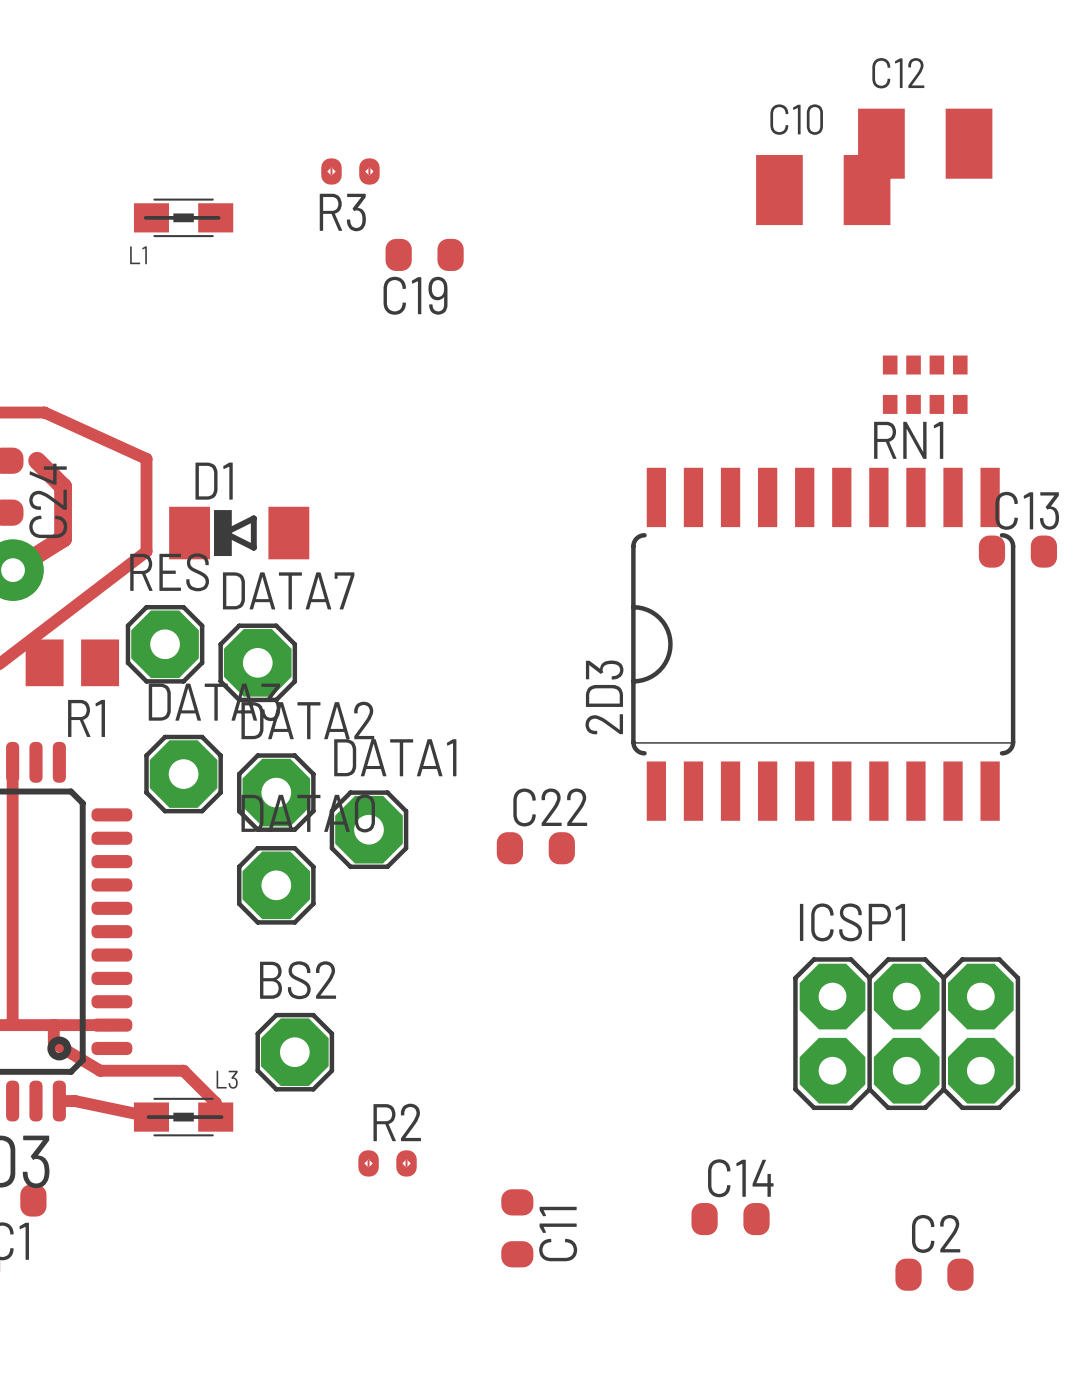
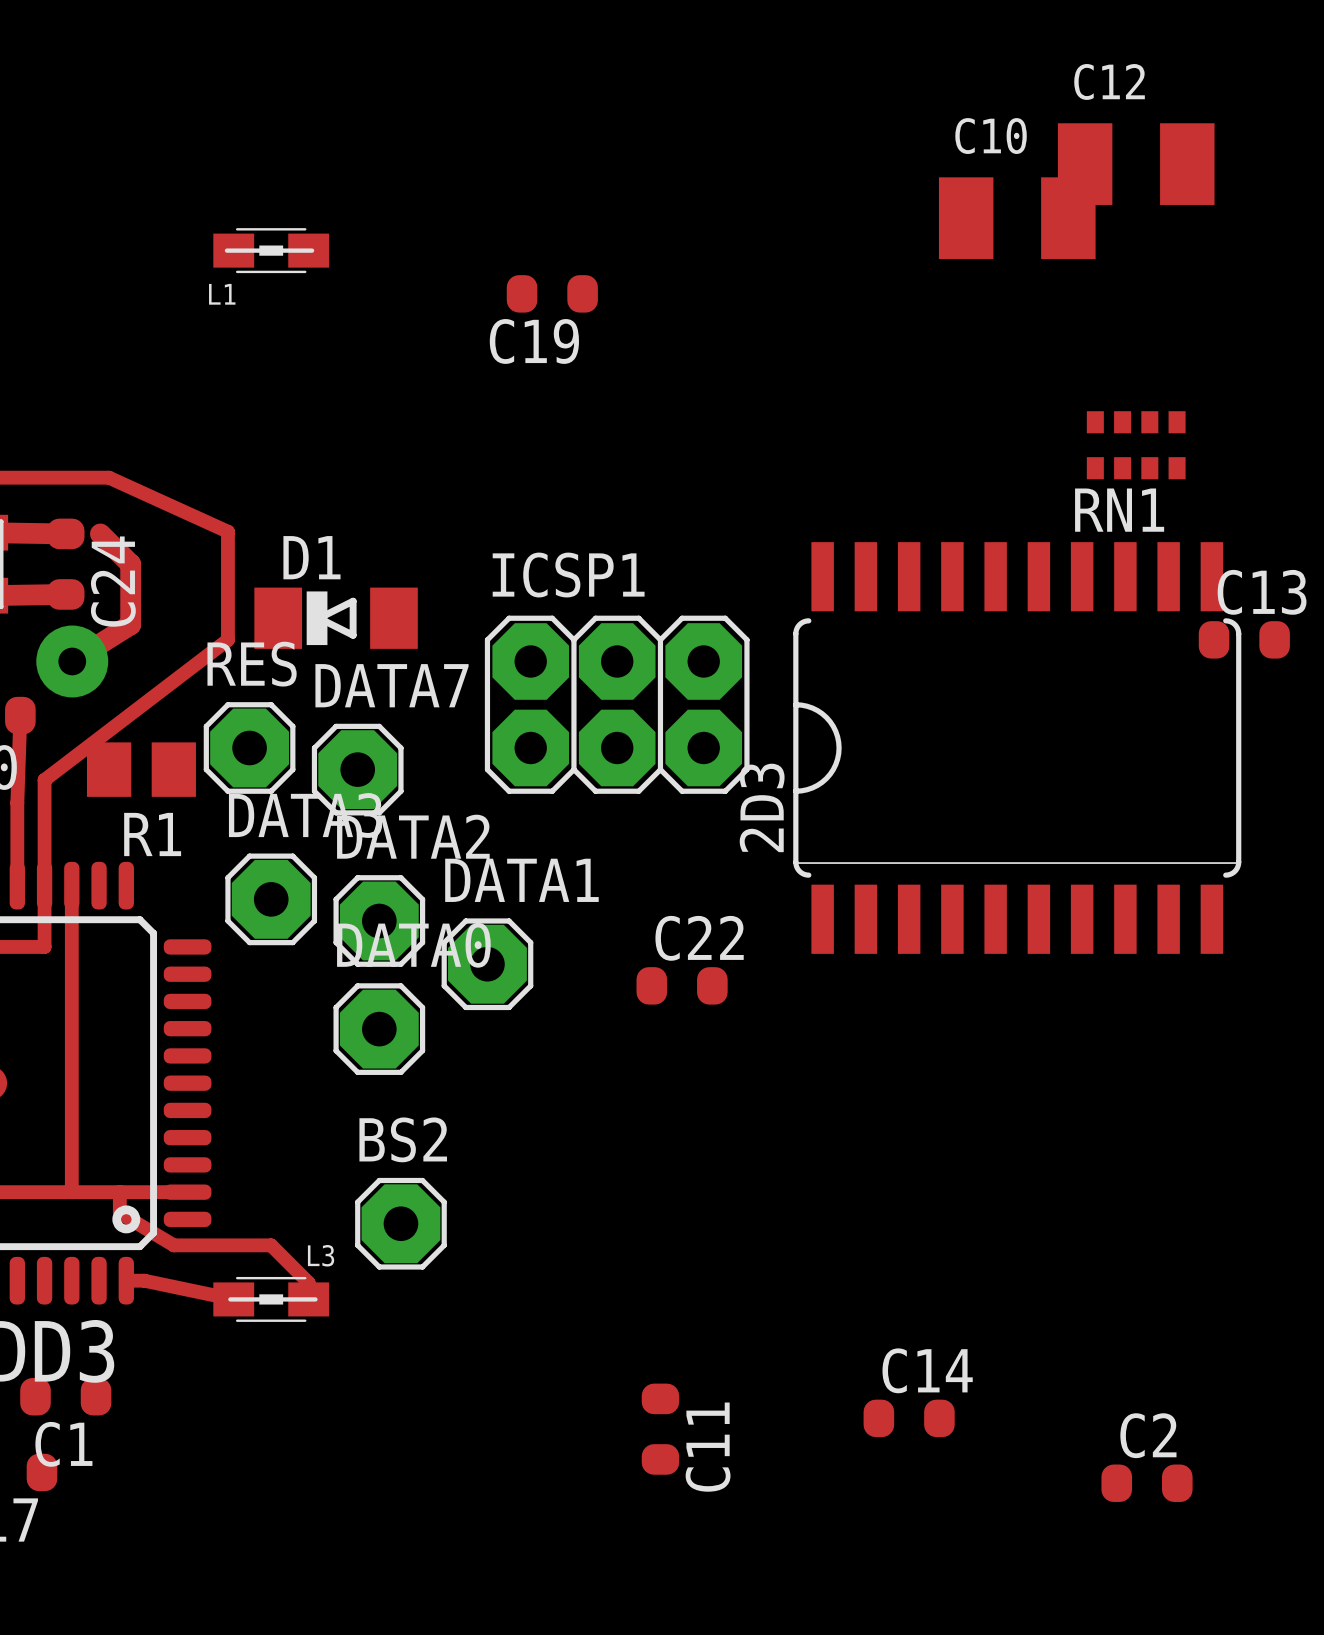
R3: (350, 171) -> none
ICSP1 position: (906, 1033) -> (617, 704)
R2: (387, 1163) -> none

